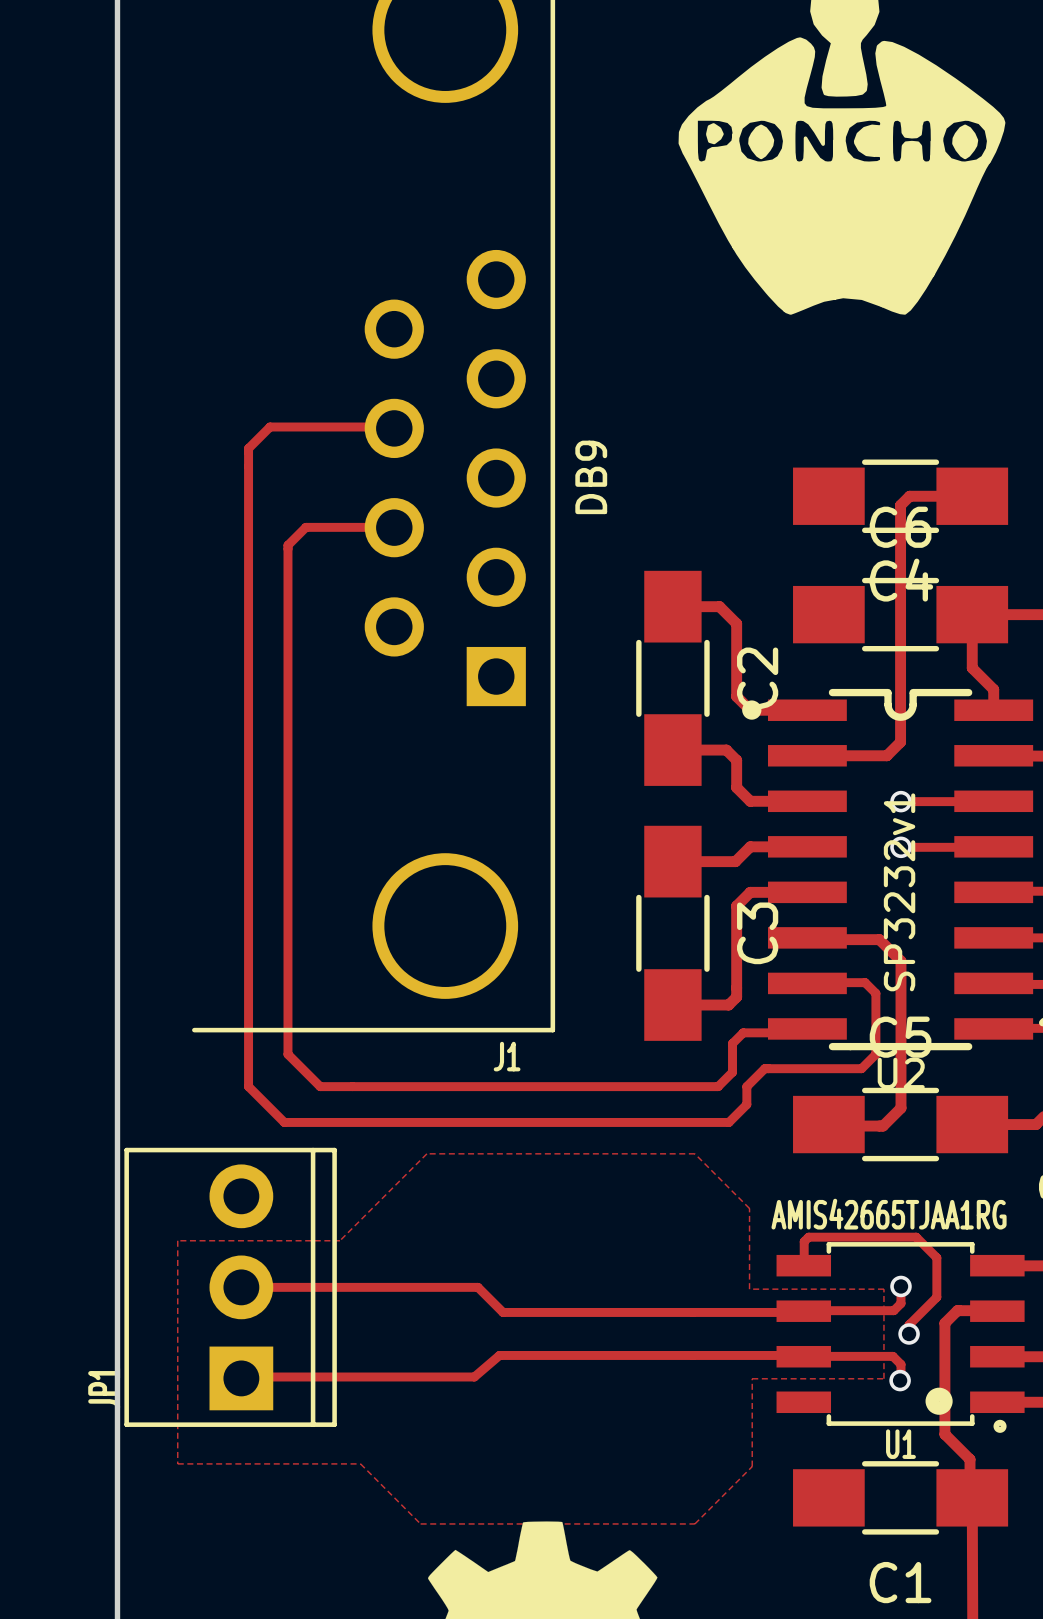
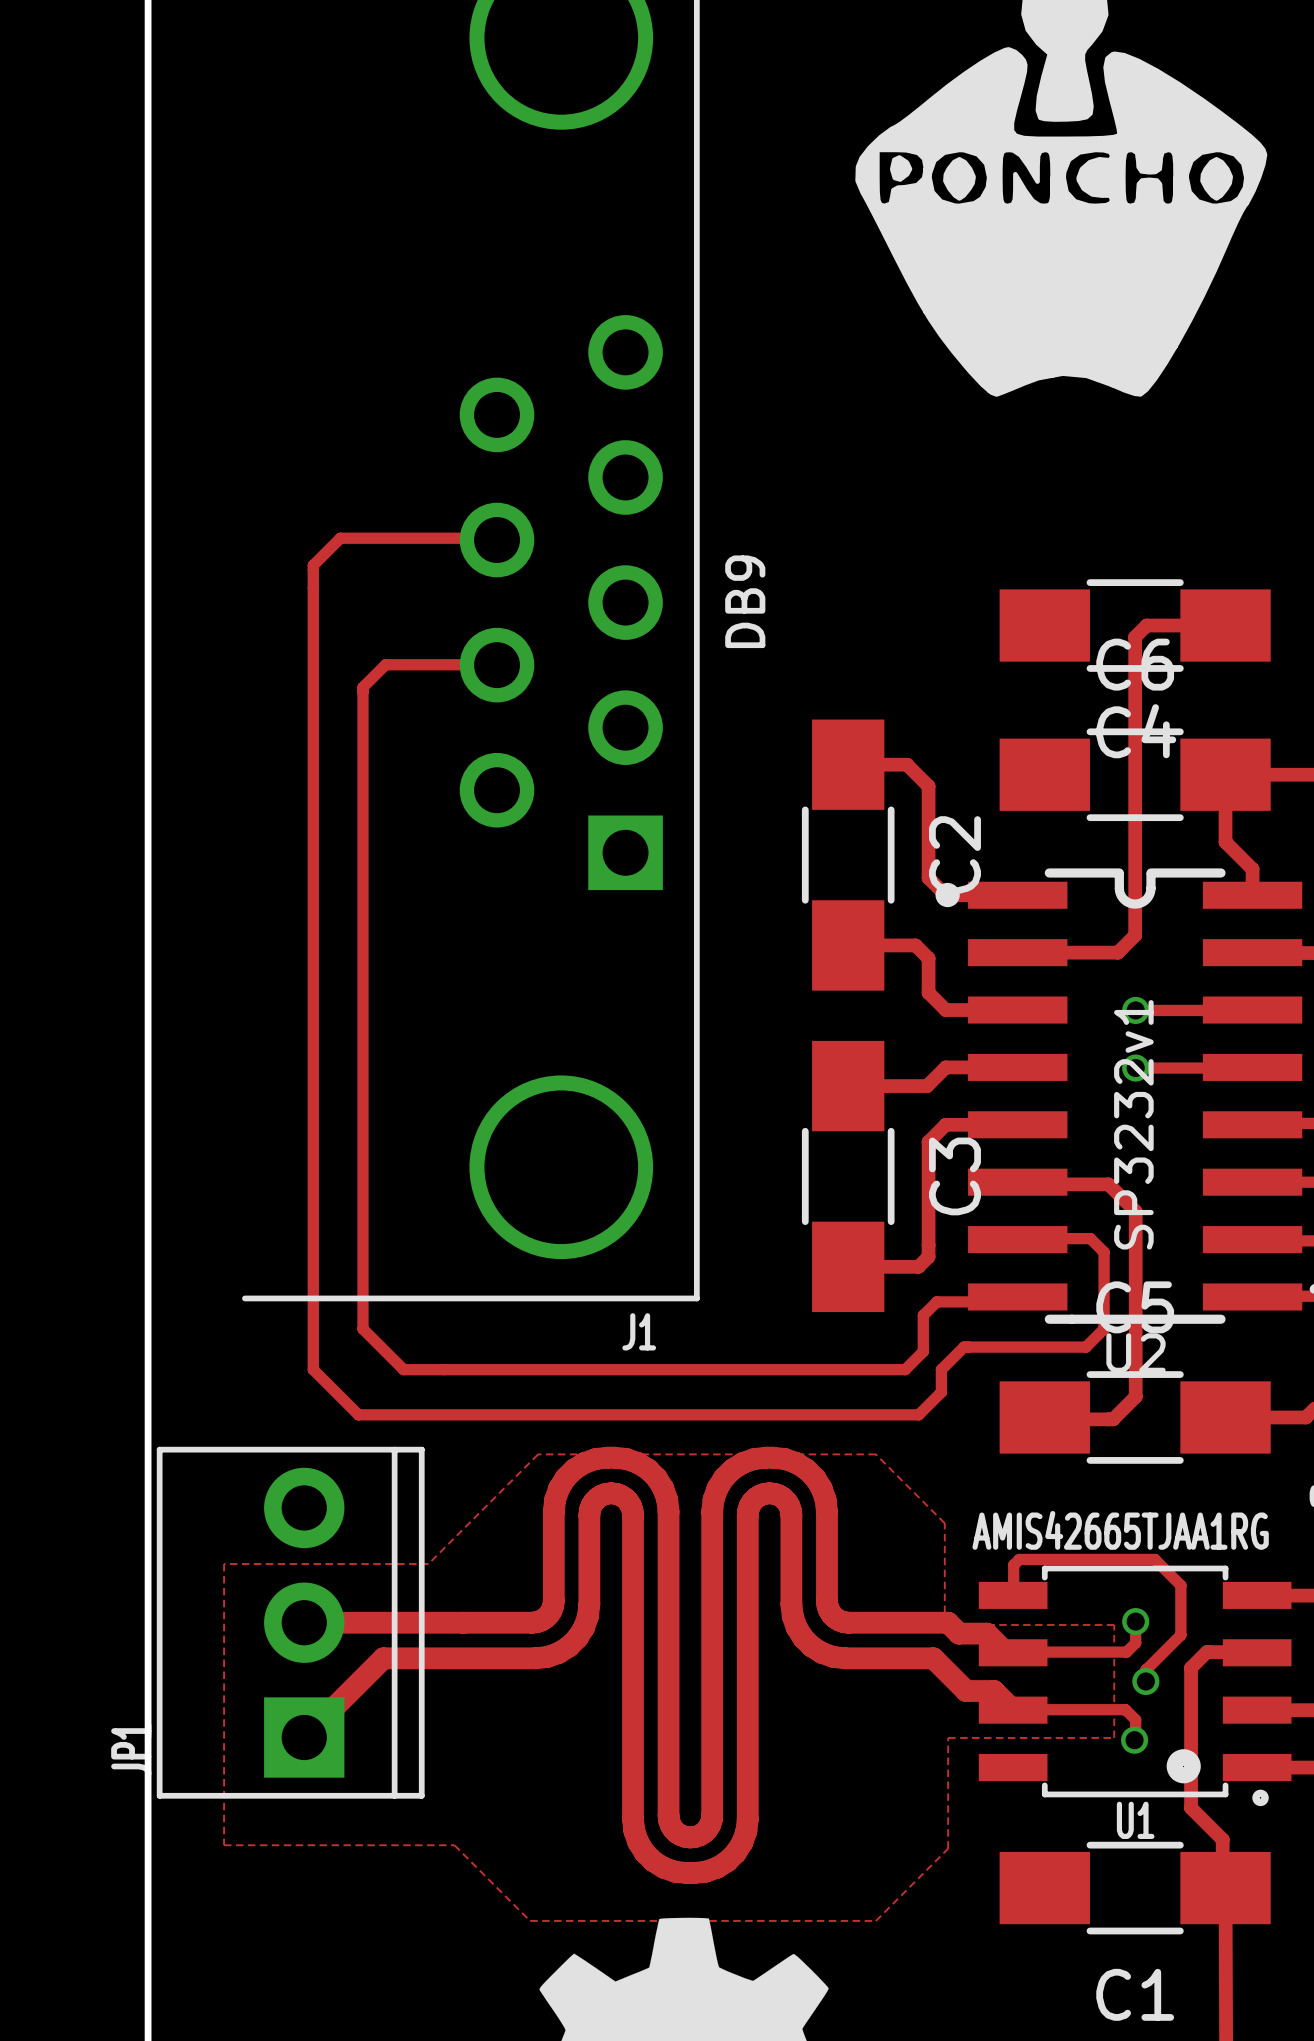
track width: thin (241, 1287) (422, 1287) -> thick (304, 1622) (531, 1622)
track: (422, 1287) (477, 1287) (503, 1312) (802, 1312) -> (531, 1622) (545, 1617) (553, 1605) (553, 1511) (559, 1488) (565, 1478) (584, 1463) (607, 1457) (626, 1459) (648, 1469) (663, 1488) (668, 1511) (669, 1820) (676, 1832) (690, 1837) (703, 1832) (710, 1825) (712, 1815) (713, 1499) (723, 1478) (742, 1463) (766, 1457) (784, 1459) (806, 1469) (821, 1488) (826, 1511) (826, 1600) (829, 1610) (835, 1617) (848, 1622) (948, 1622) (959, 1633) (986, 1633) (1006, 1652) (1013, 1652) (1004, 1652)
track: (802, 1355) (499, 1355) (474, 1376) (242, 1376) -> none
track: none -> (1013, 1710) (994, 1691) (966, 1691) (933, 1658) (845, 1658) (821, 1652) (811, 1646) (796, 1627) (792, 1616) (790, 1510) (786, 1501) (779, 1495) (769, 1493) (760, 1495) (749, 1505) (747, 1515) (746, 1831) (735, 1852) (717, 1867) (693, 1873) (675, 1871) (663, 1867) (644, 1852) (634, 1831) (632, 1515) (630, 1505) (624, 1498) (611, 1493) (597, 1498) (589, 1510) (588, 1616) (584, 1627) (569, 1646) (558, 1652) (535, 1658) (383, 1658) (304, 1737)

